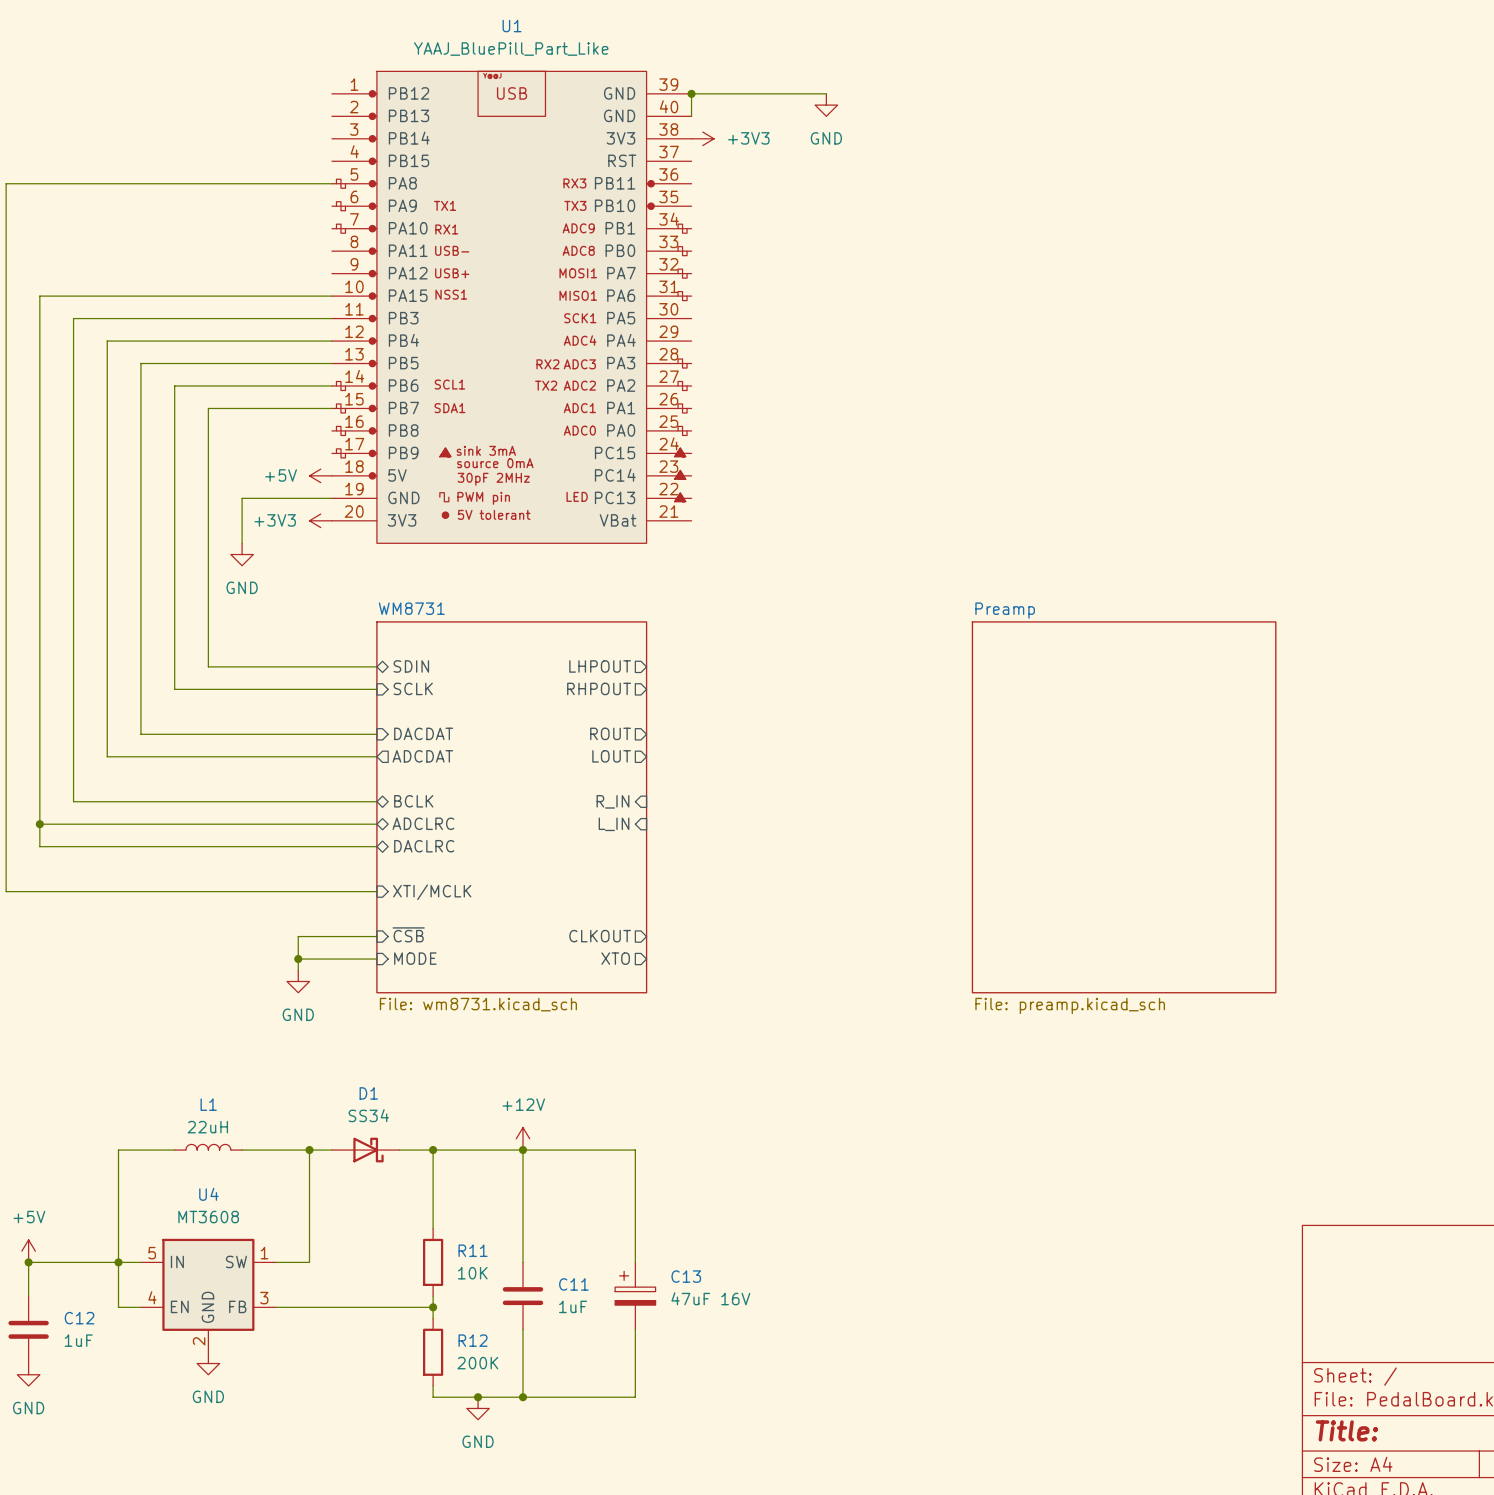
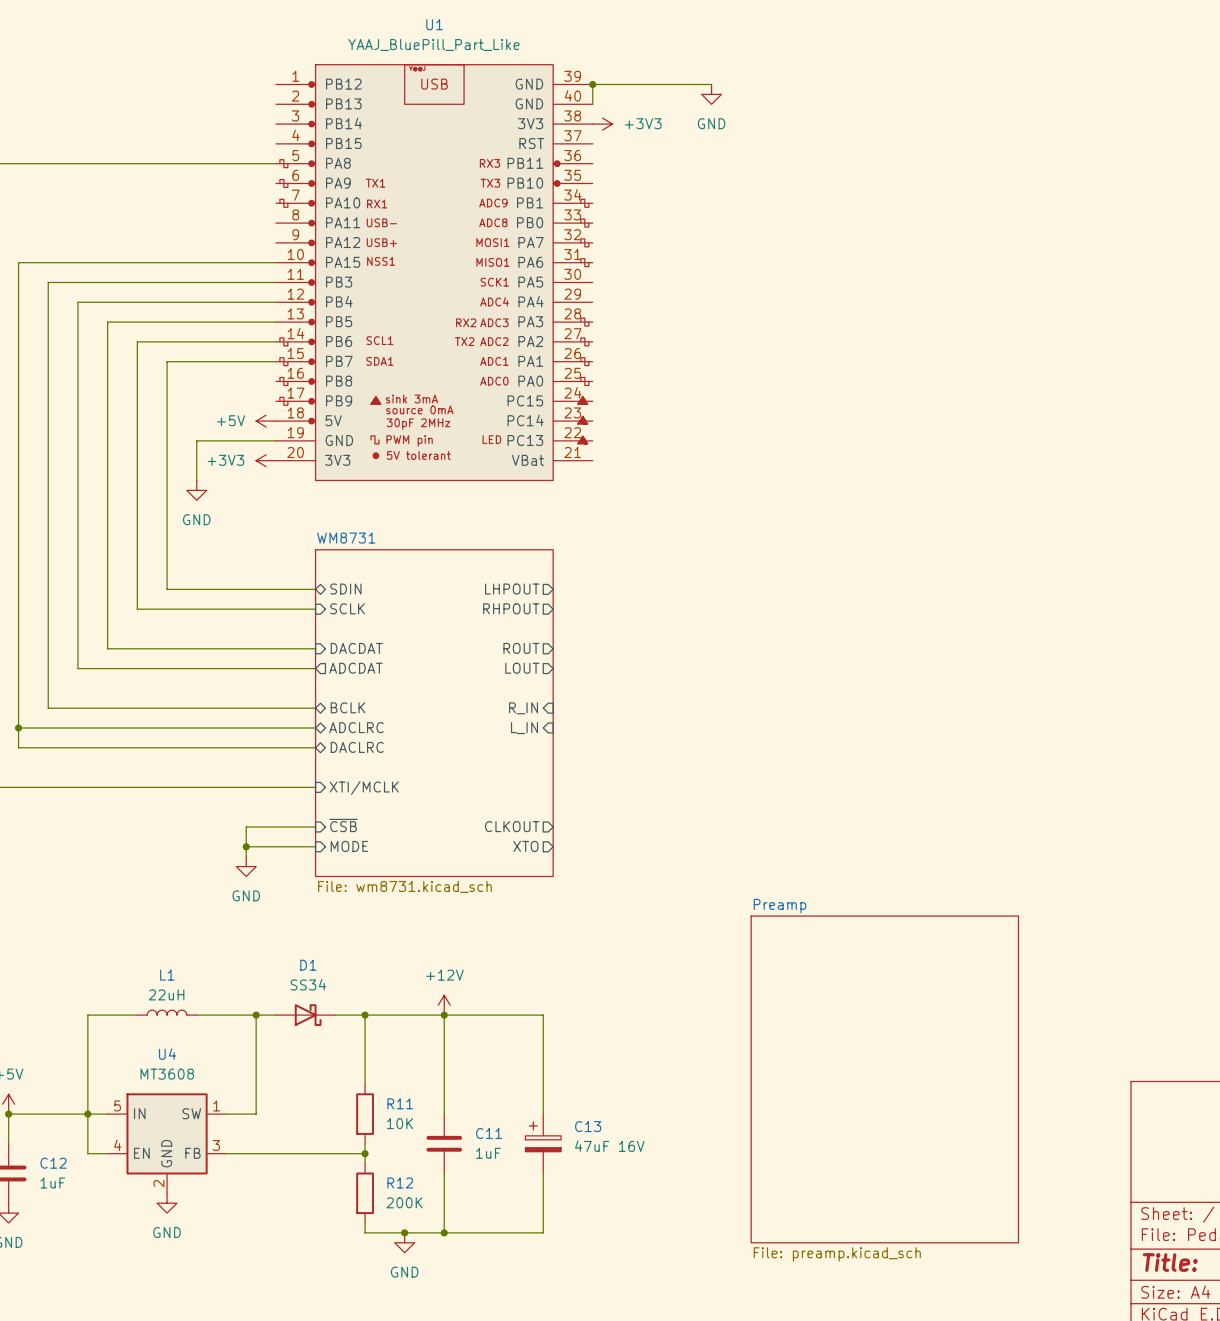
sheet Preamp: File: preamp.kicad_sch (1124, 807) -> none
sheet Preamp: none -> File: preamp.kicad_sch (884, 1079)

